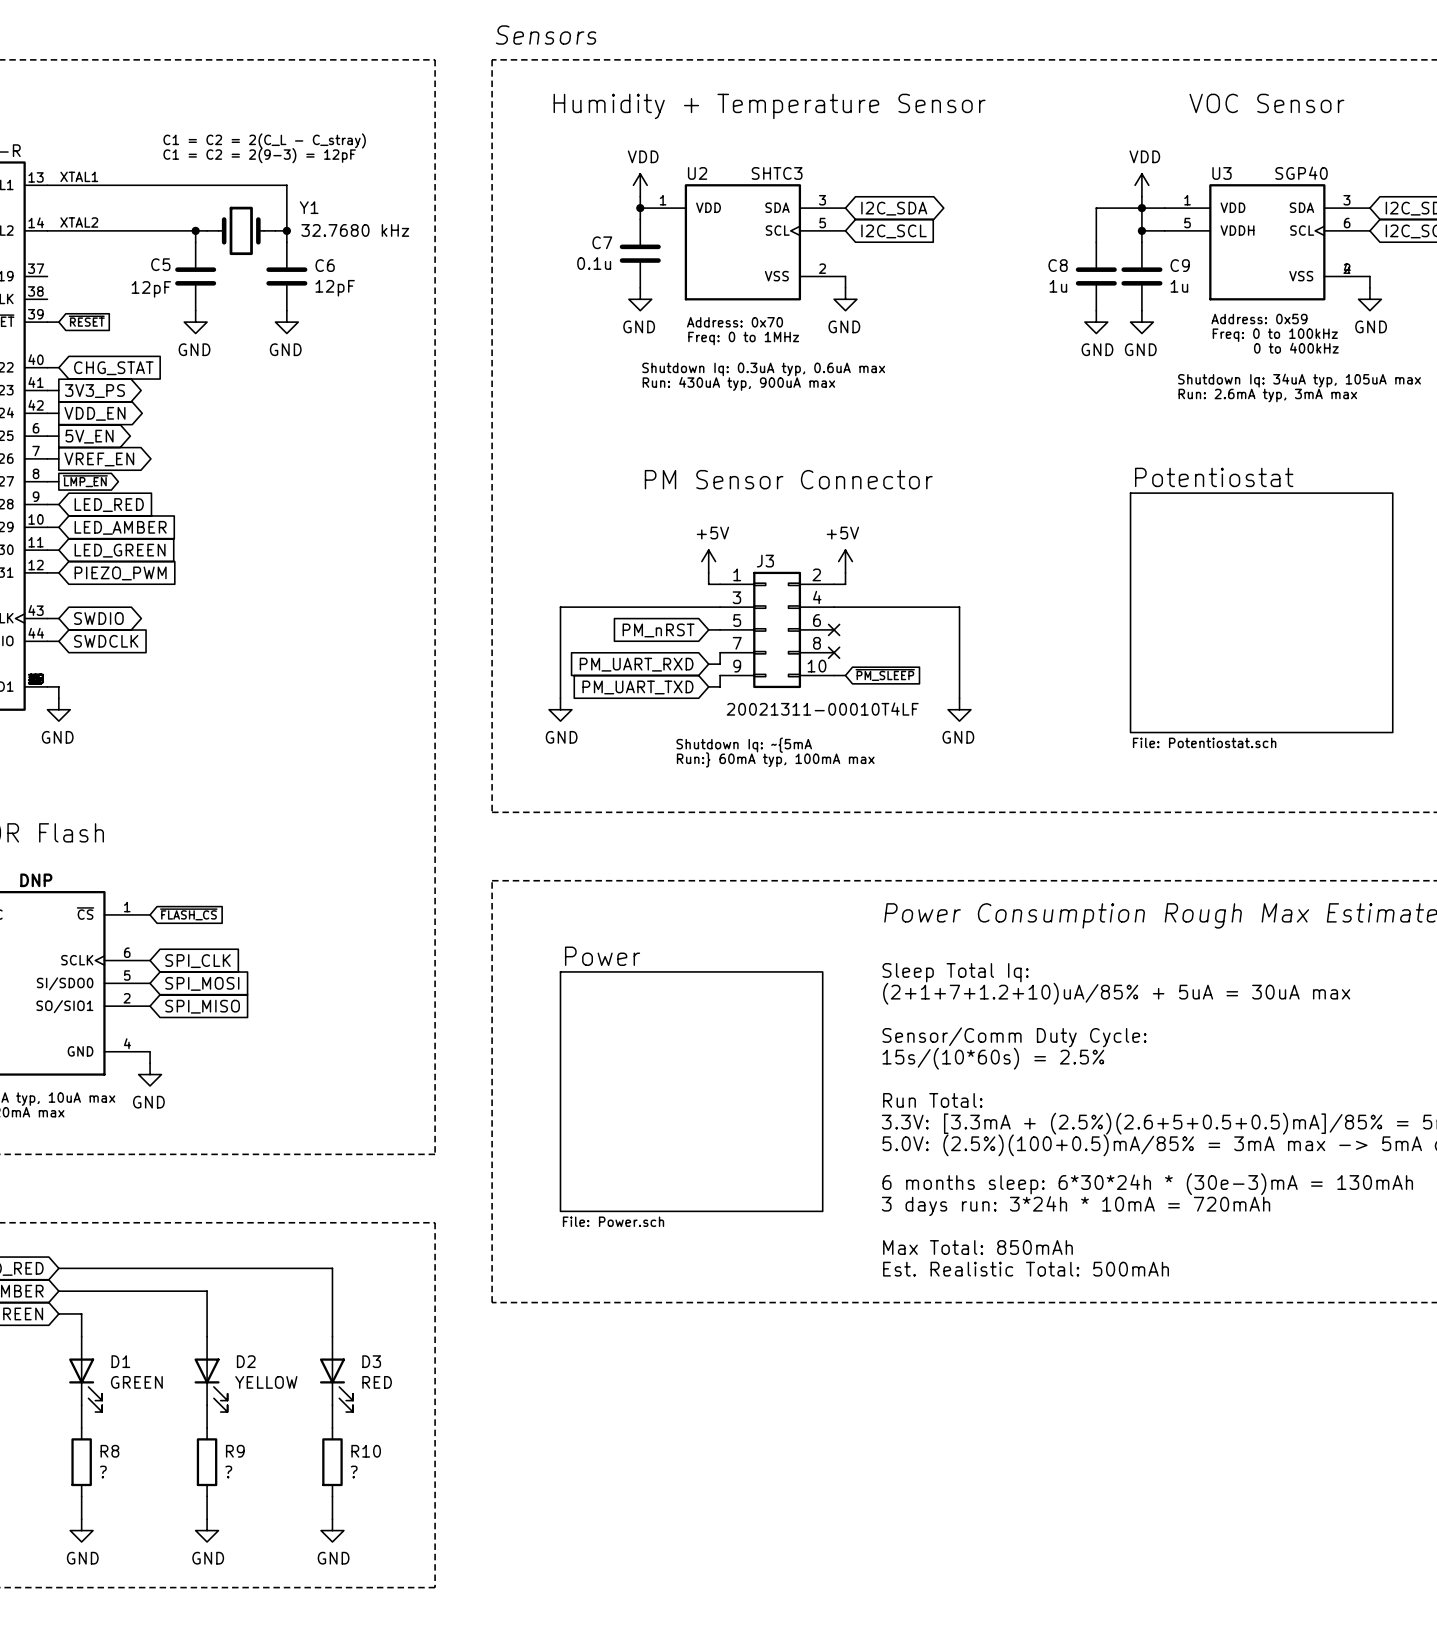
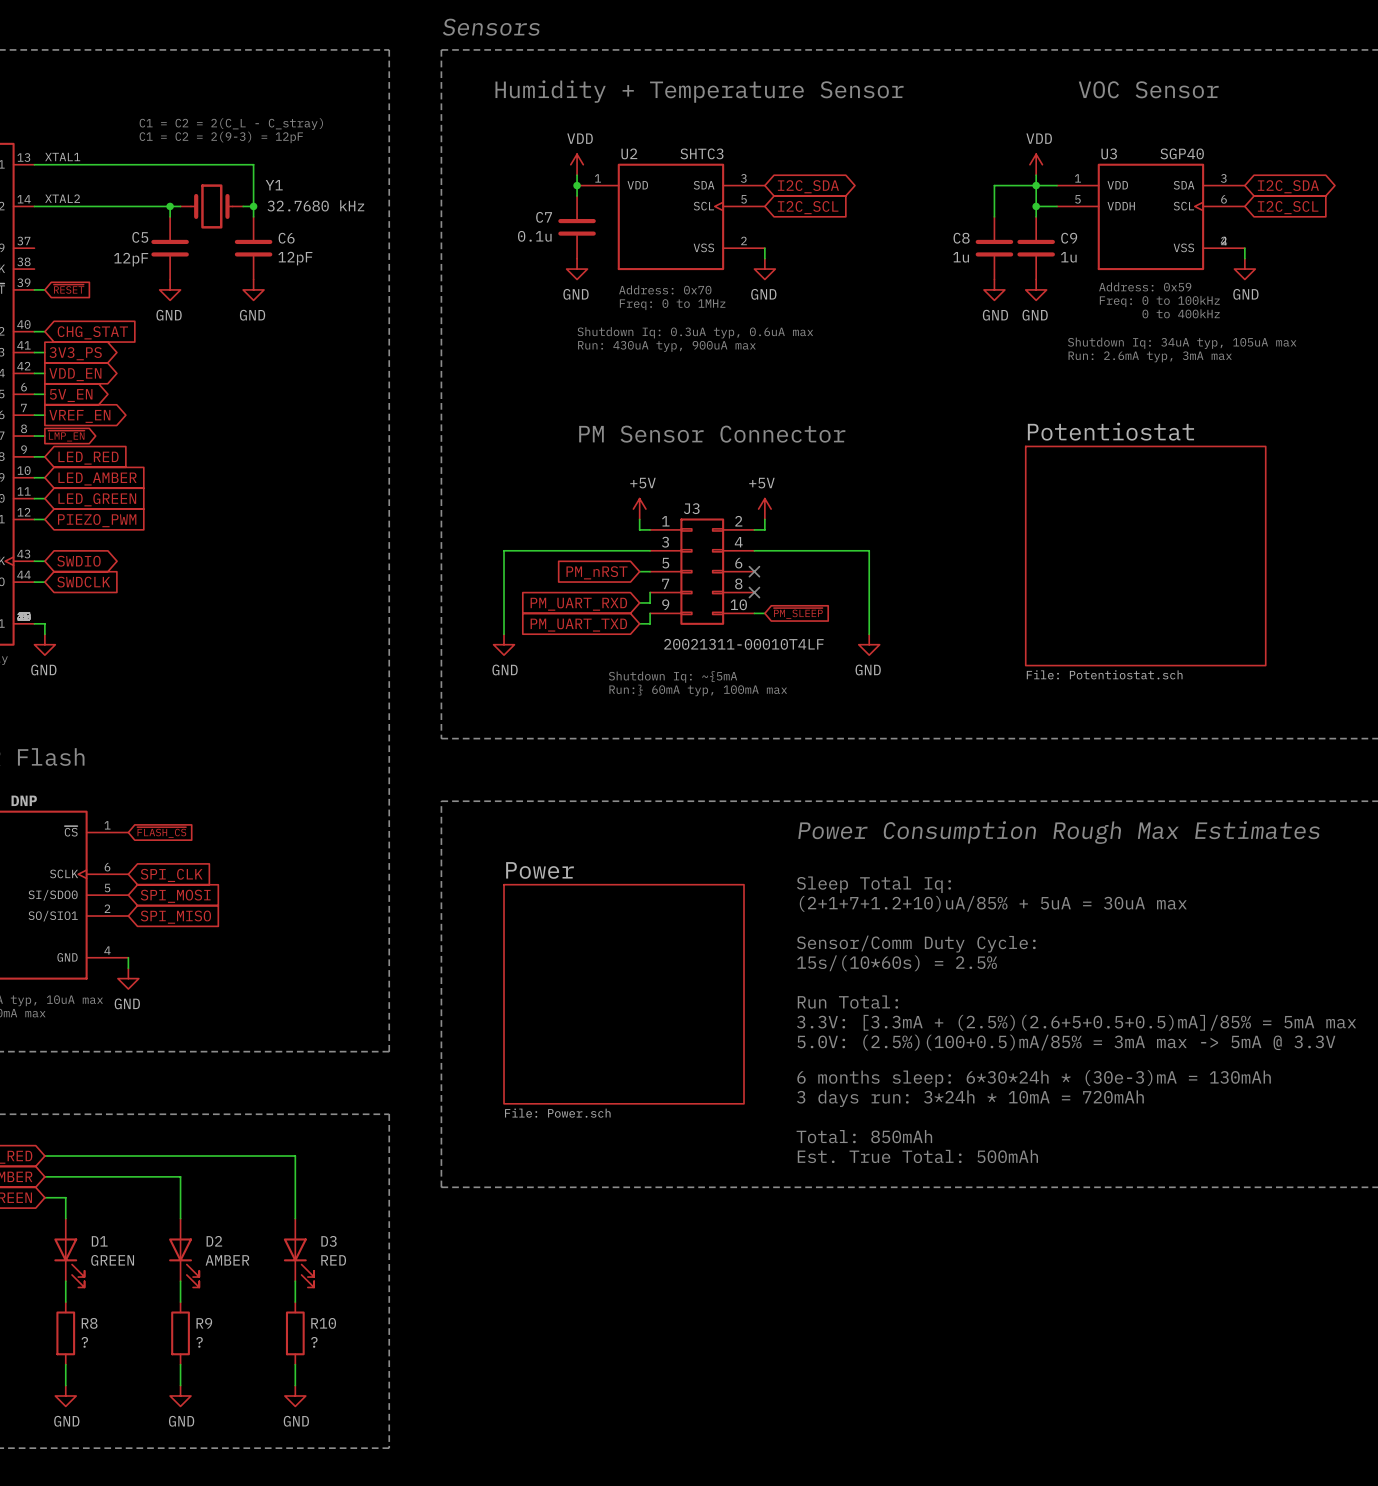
text: Max Total: 850mAh (977, 1247) -> Total: 850mAh (864, 1136)
text: Est. Realistic Total: 500mAh (1026, 1269) -> Est. True Total: 500mAh (917, 1156)
D2 value: YELLOW (266, 1382) -> AMBER (227, 1260)

